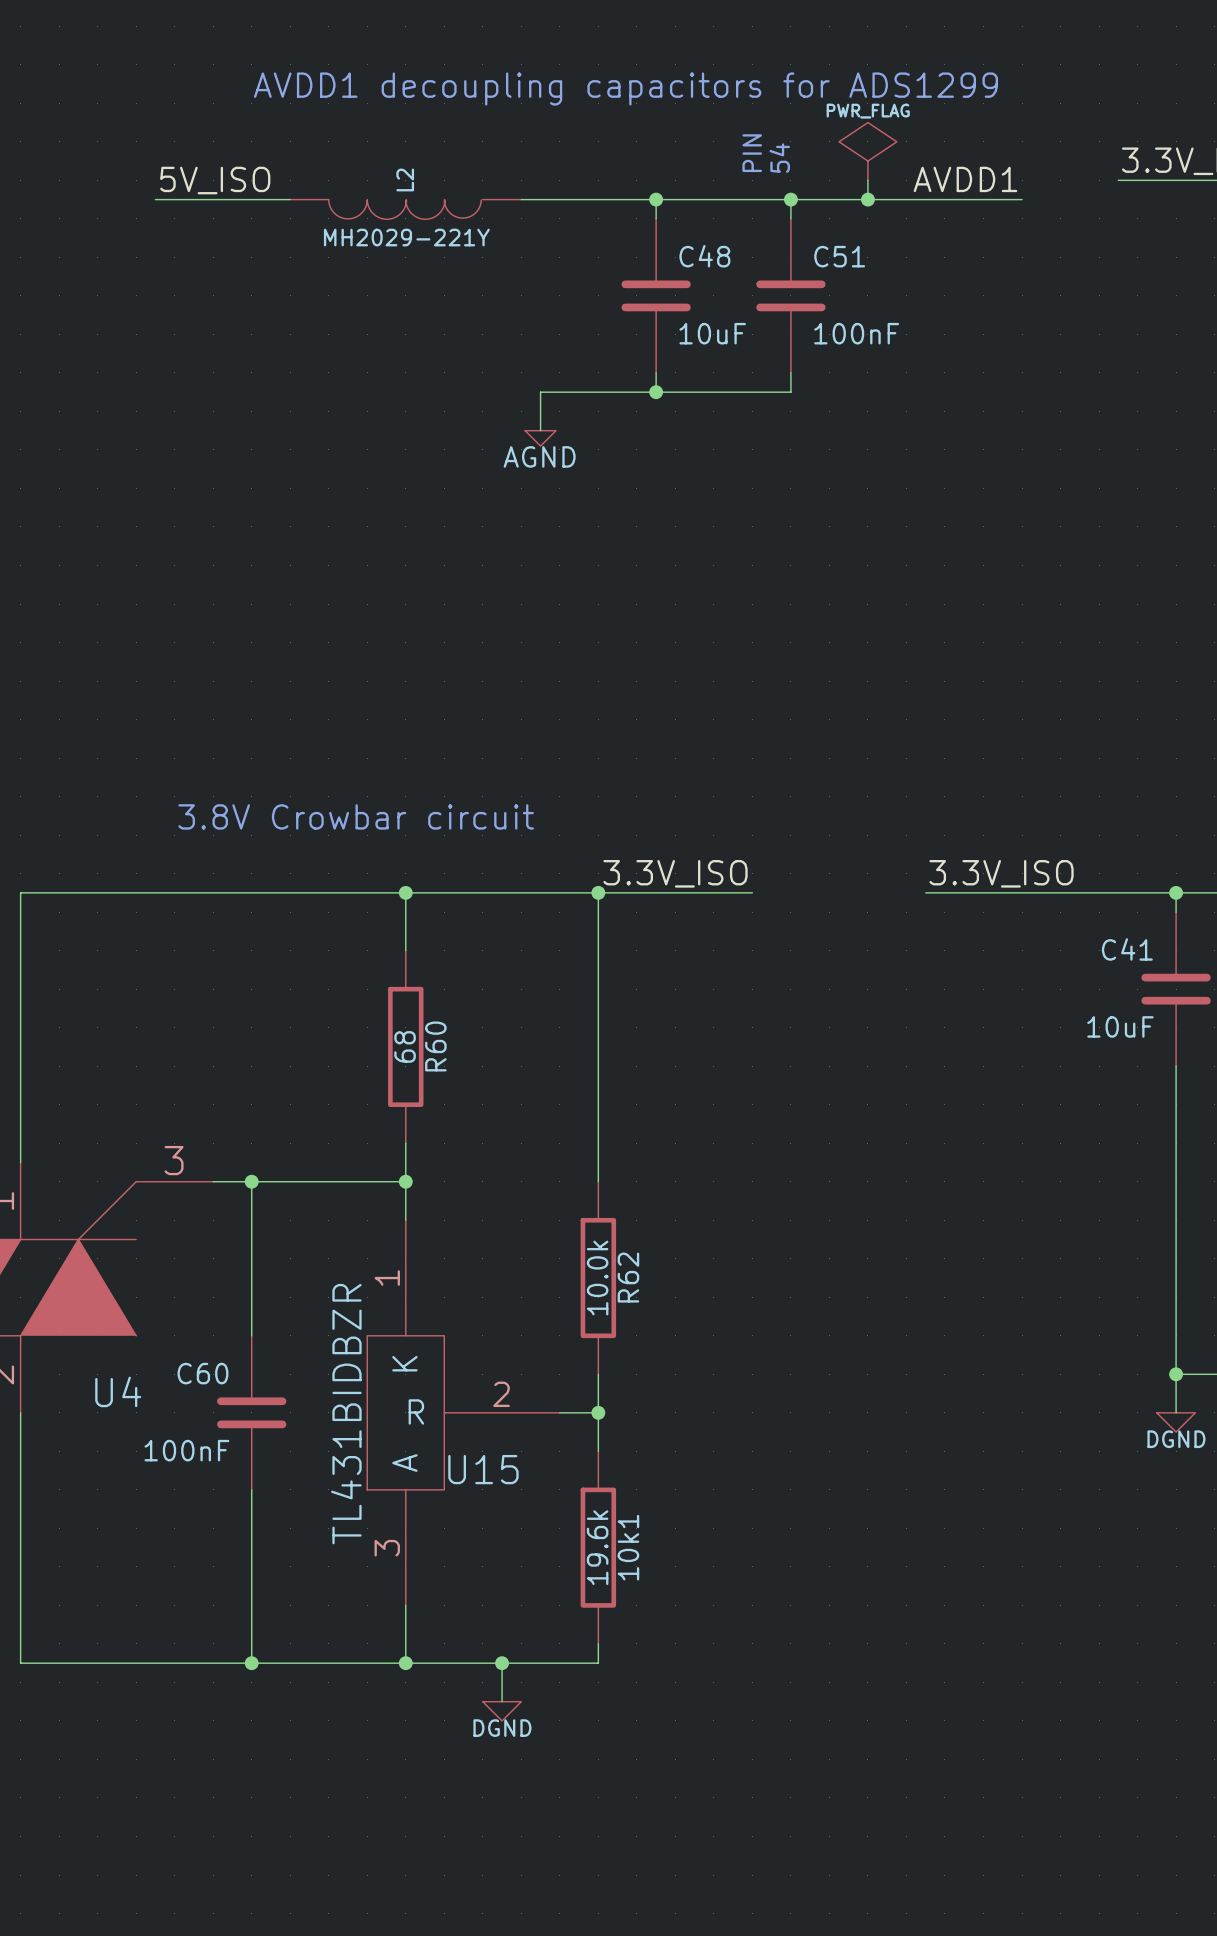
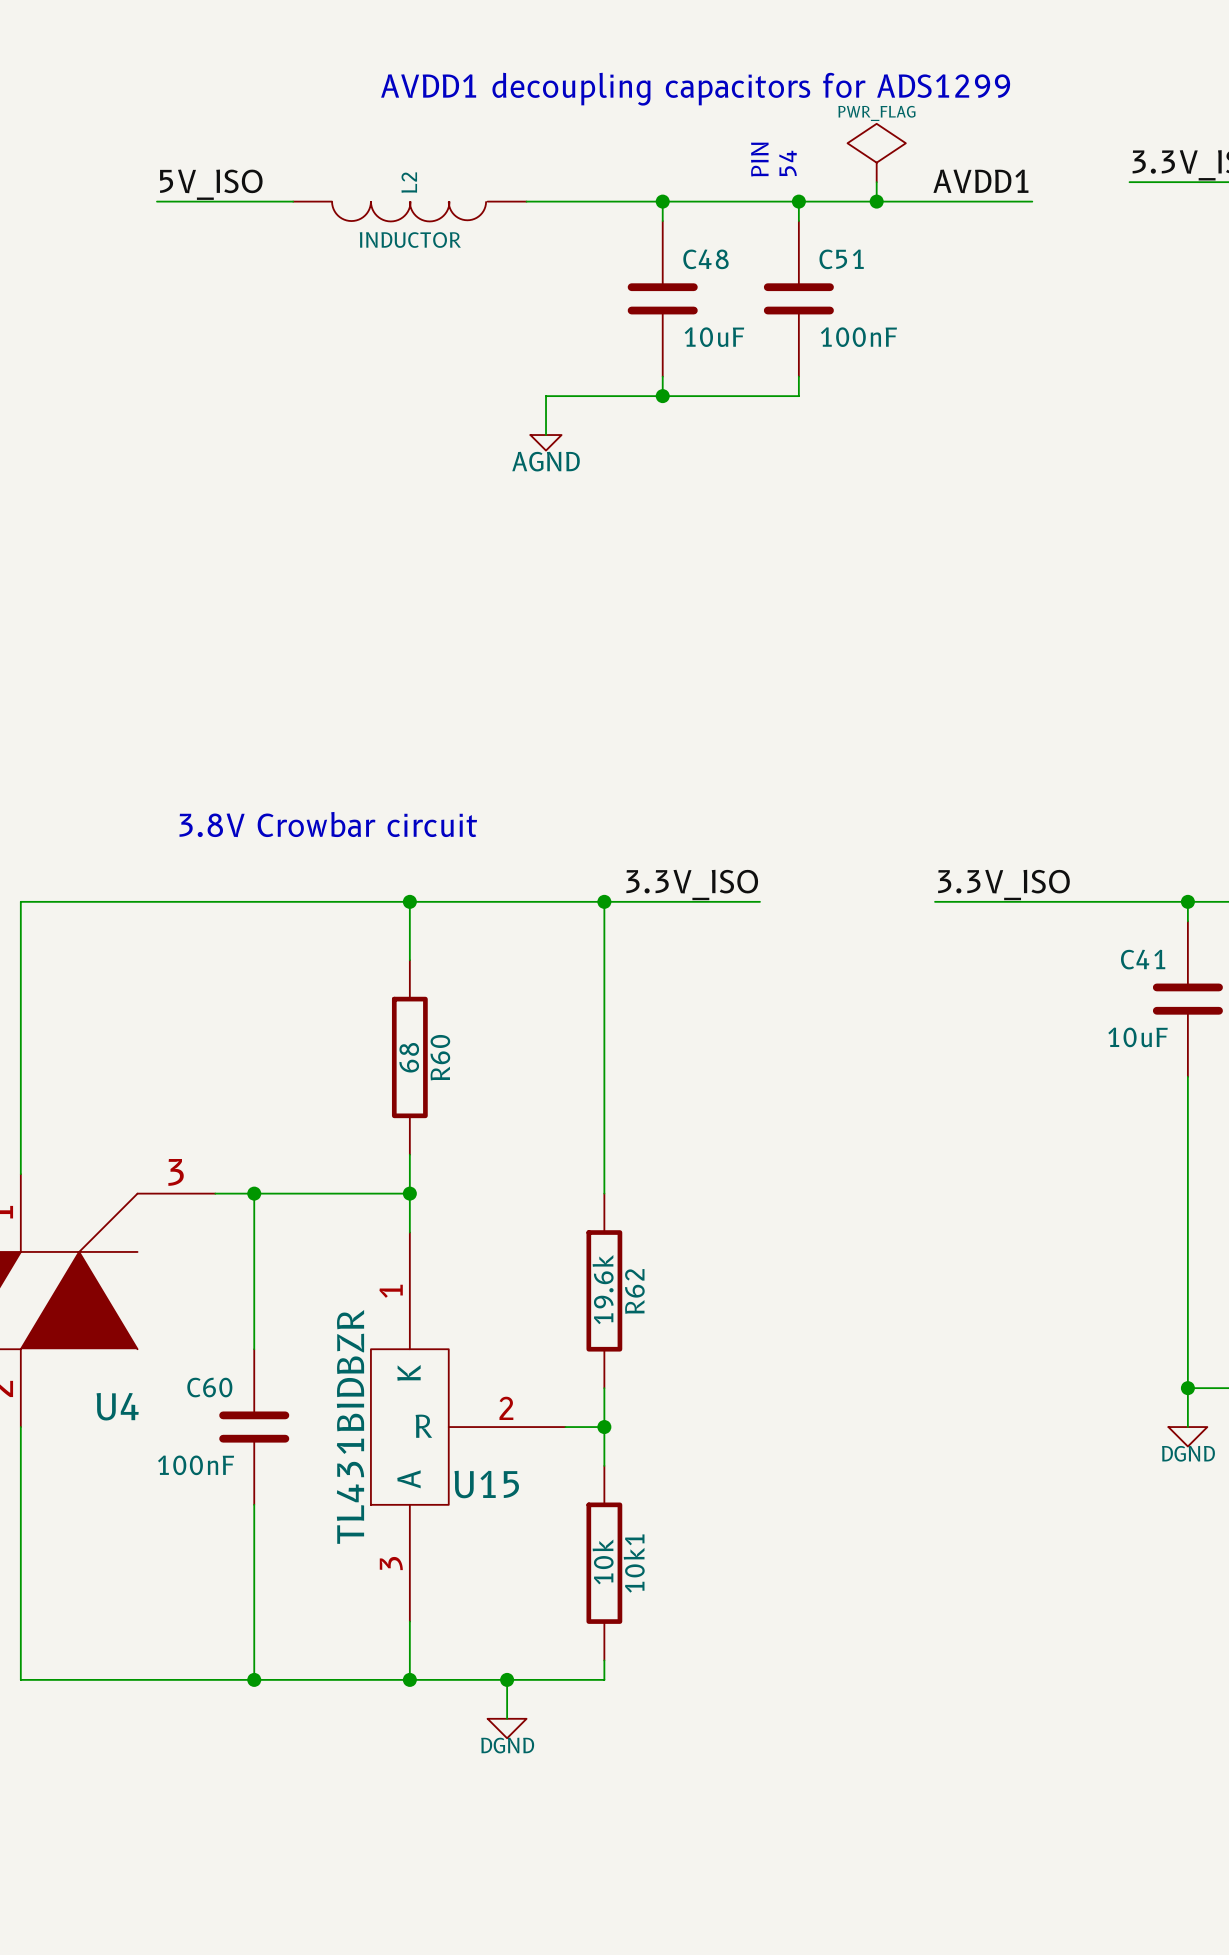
L2 value: MH2029-221Y (406, 237) -> INDUCTOR (410, 240)
R62 value: 10.0k (597, 1278) -> 19.6k (603, 1289)
10k1 value: 19.6k (597, 1547) -> 10k (603, 1561)

